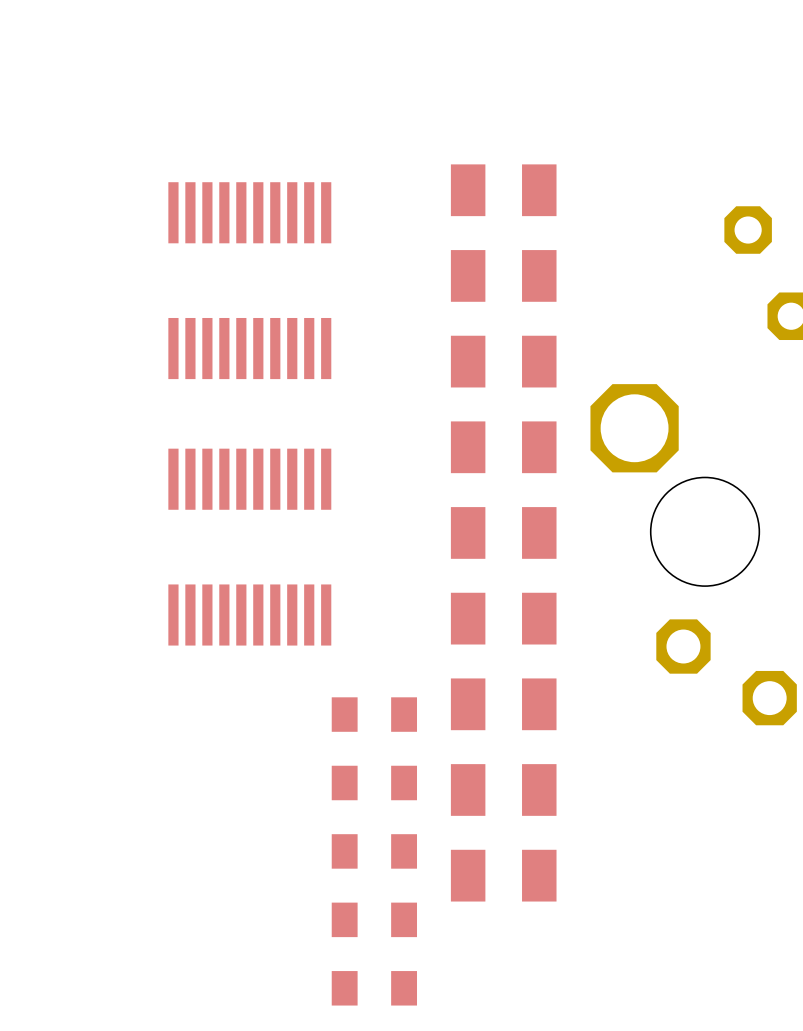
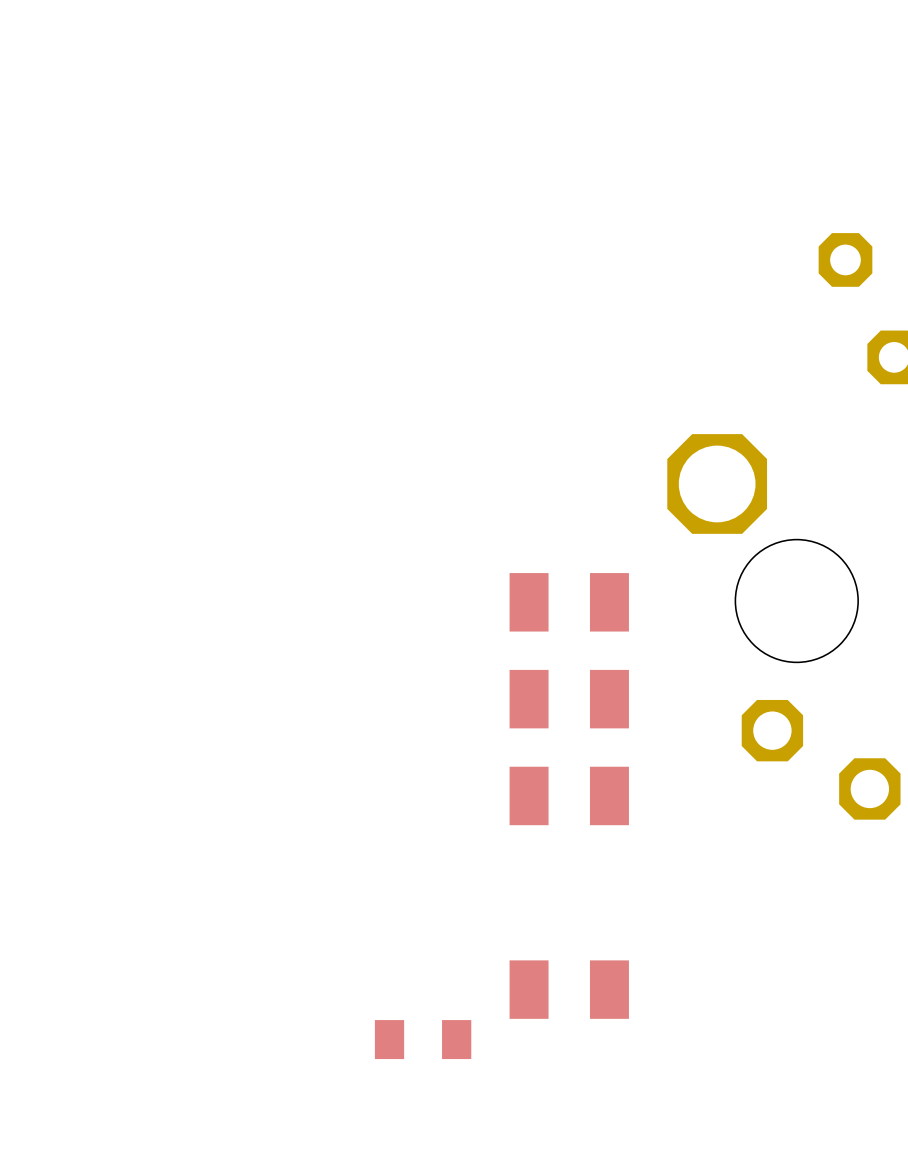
part: (503, 190) -> none
part: (503, 275) -> none
part: (249, 280) -> none
part: (503, 361) -> none
part: (503, 447) -> none
part: (249, 547) -> none
part: (374, 714) -> none
part: (374, 782) -> none
part: (503, 789) -> none
part: (374, 851) -> none
part: (374, 988) -> none

